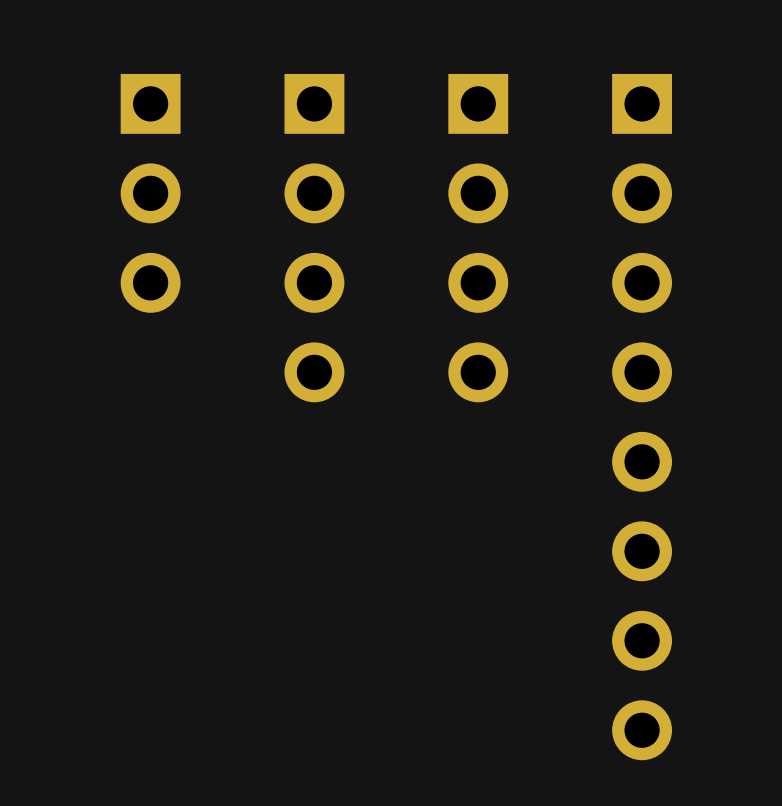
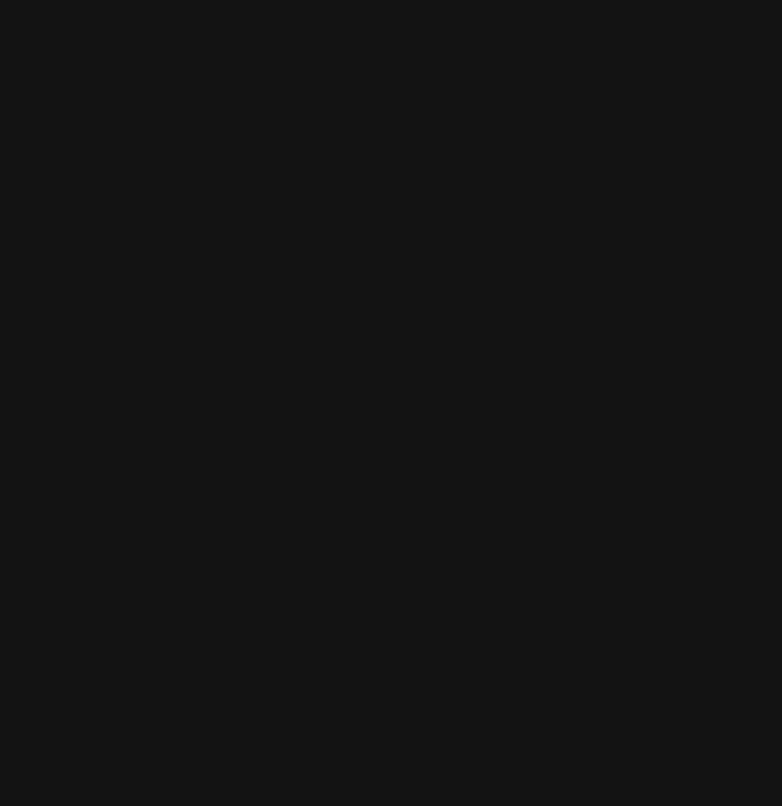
part: (150, 193) -> none
part: (314, 238) -> none
part: (478, 238) -> none
part: (642, 417) -> none

